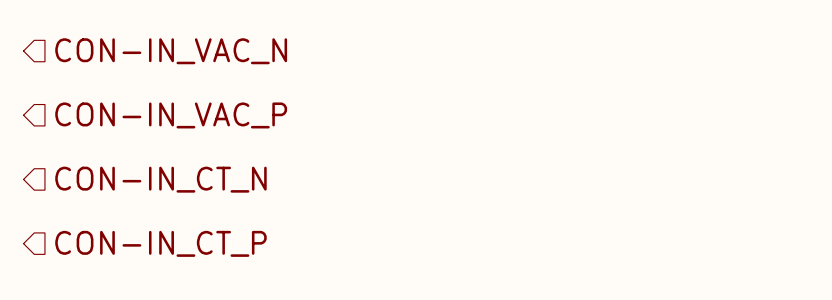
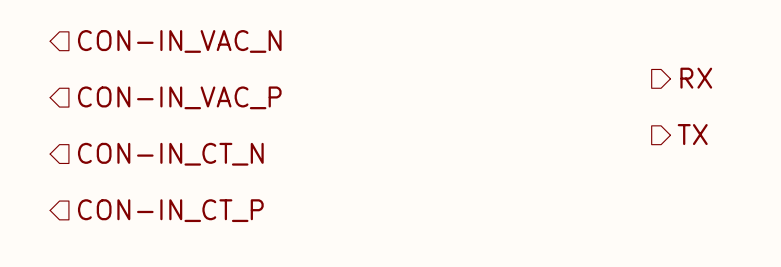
hierarchical label: none -> RX (696, 78)
hierarchical label: none -> TX (692, 134)

